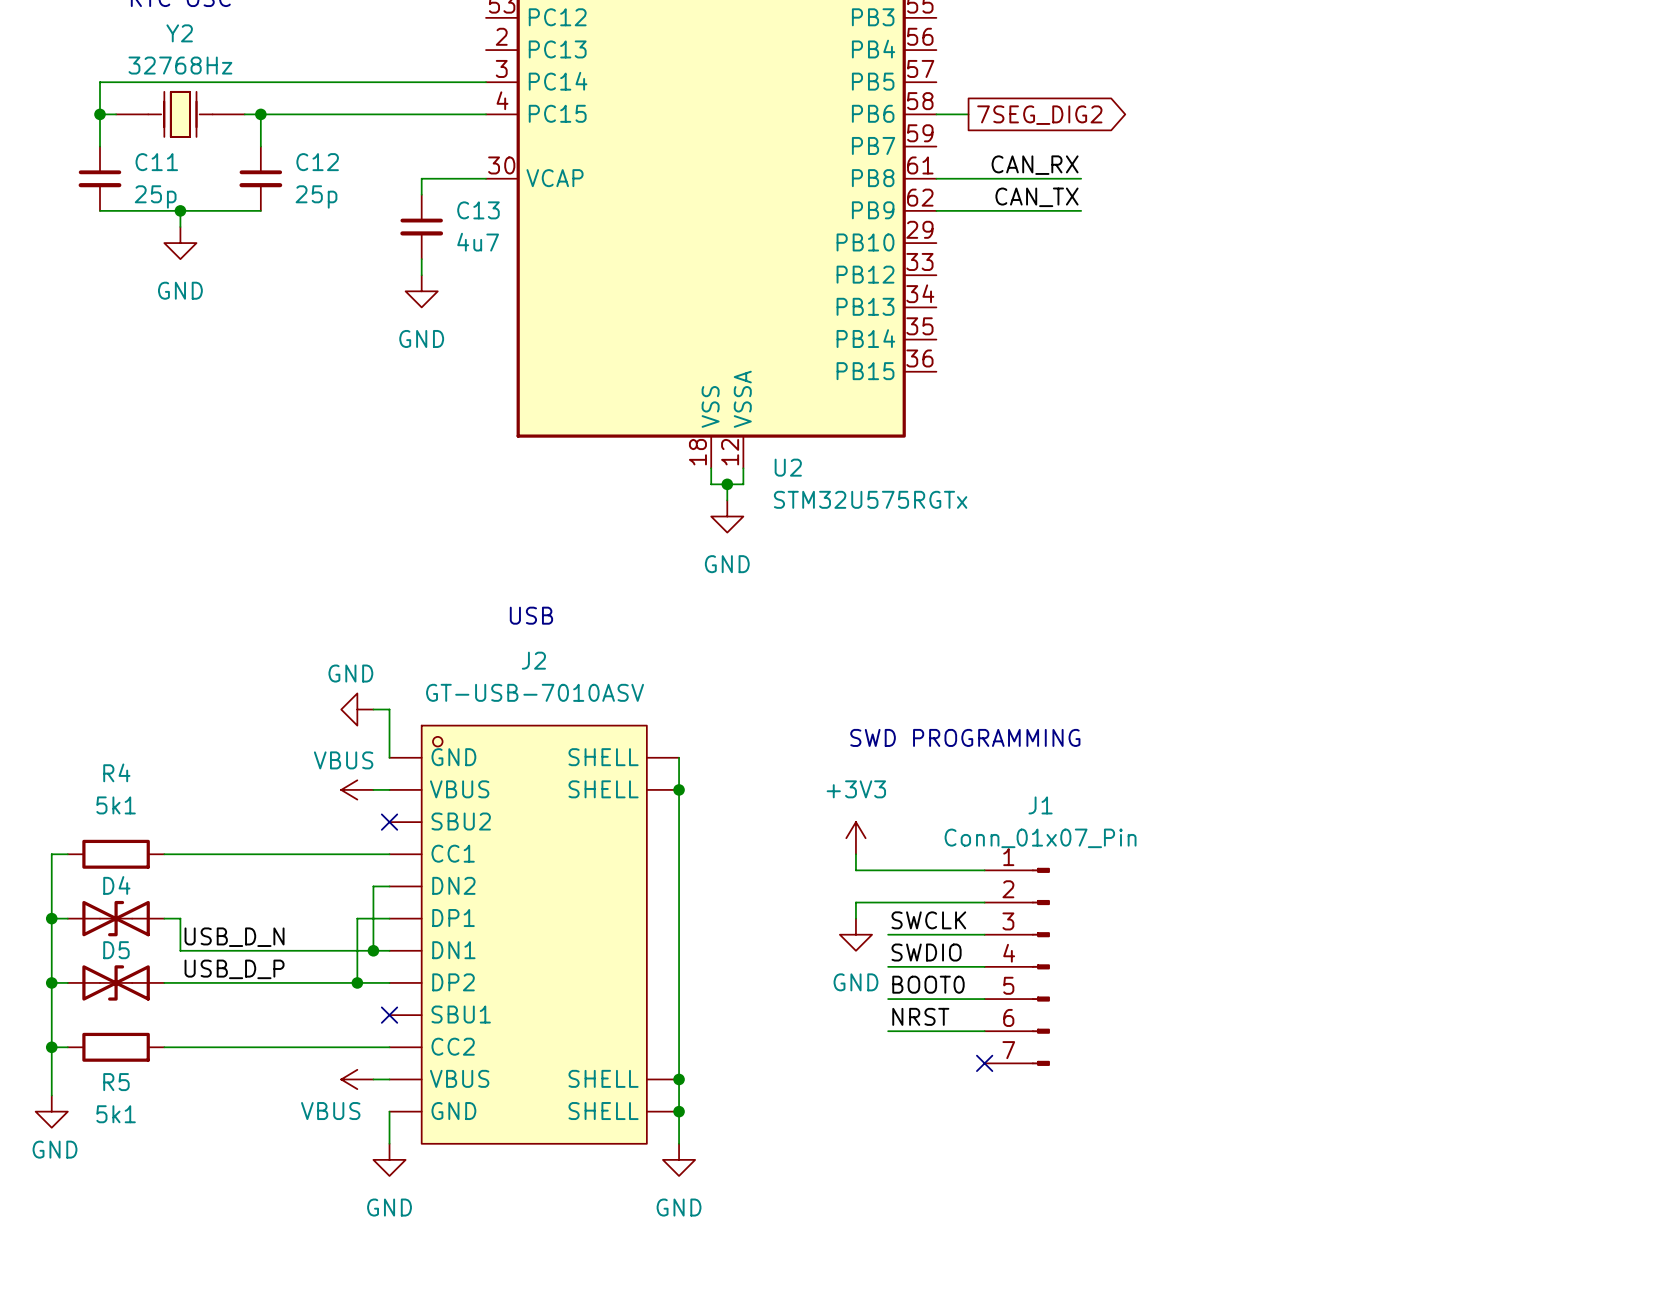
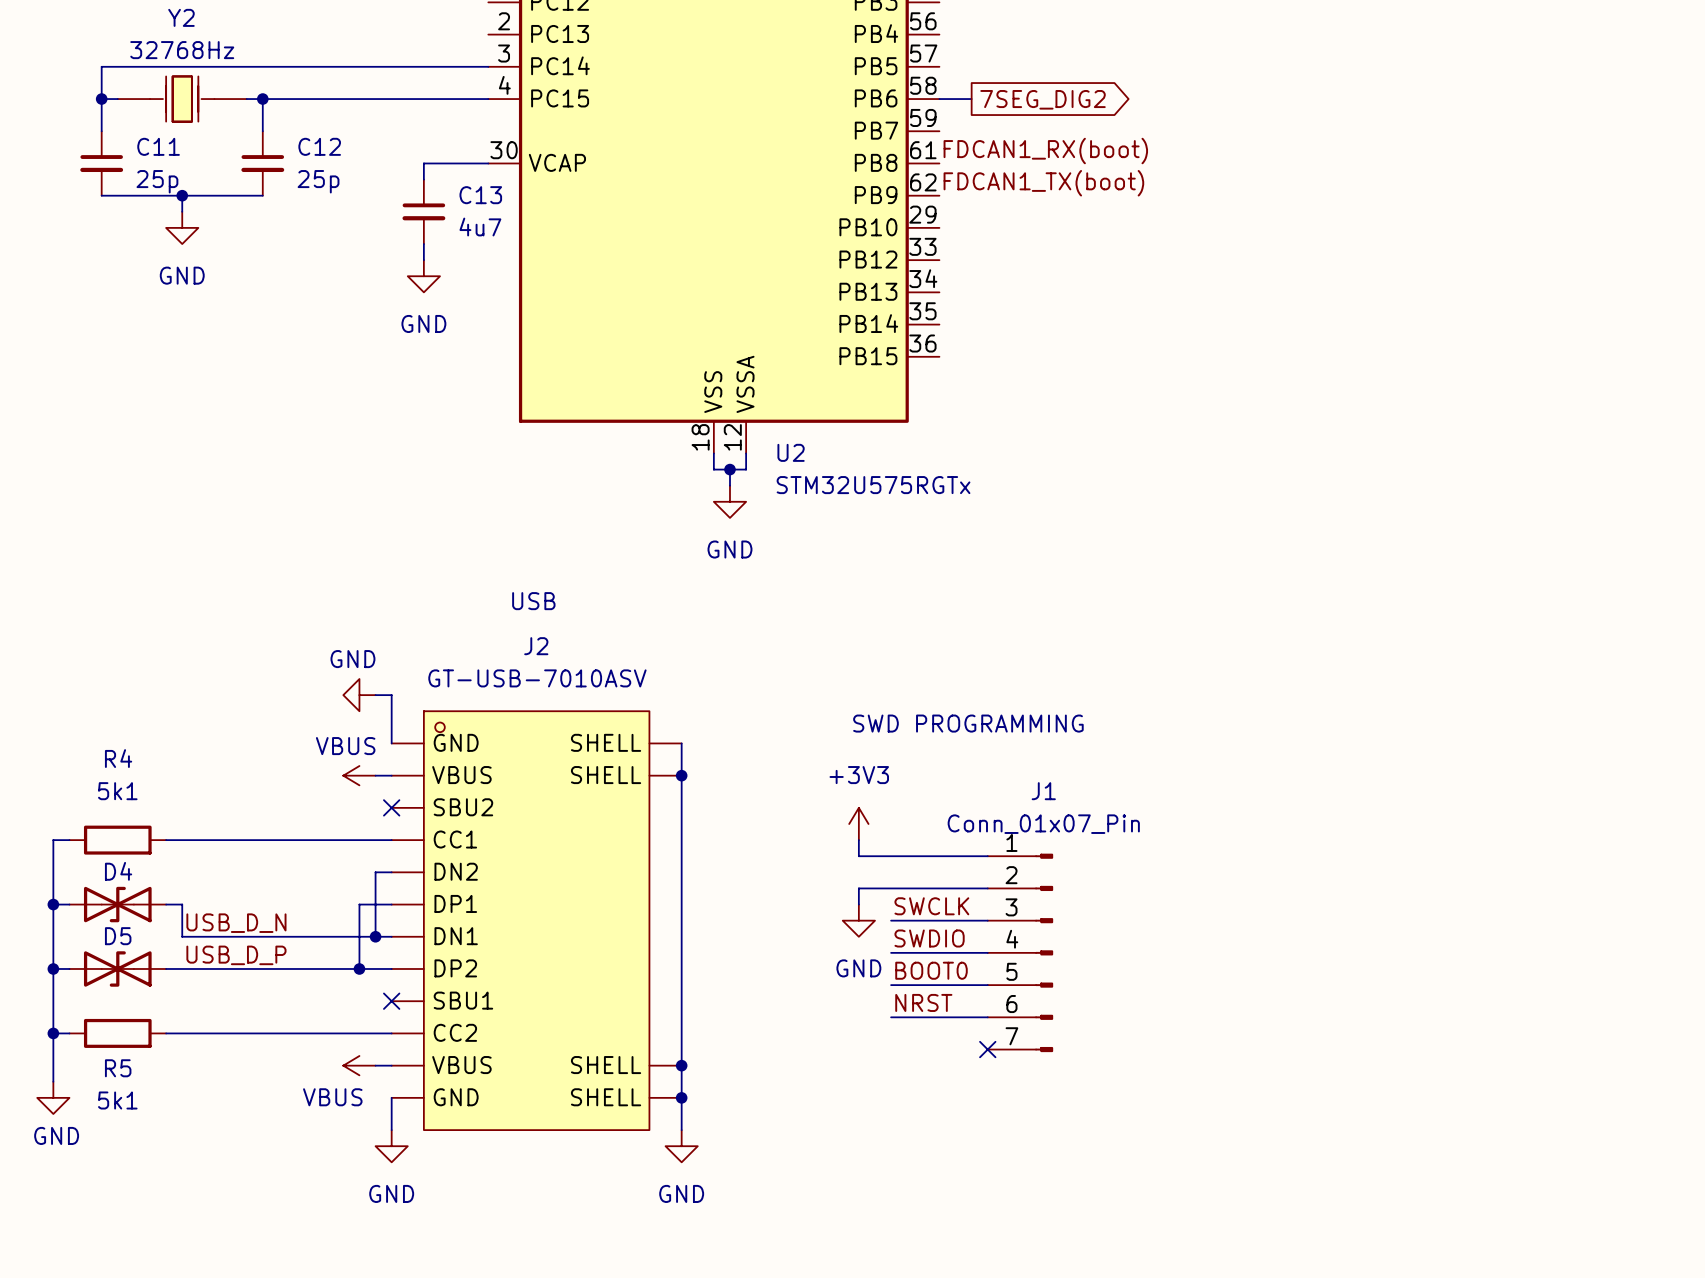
label: CAN_RX (1035, 165) -> none
label: none -> FDCAN1_RX(boot) (1045, 151)
wire: (936, 178) (1081, 178) -> none
label: CAN_TX (1036, 197) -> none
label: none -> FDCAN1_TX(boot) (1043, 183)
wire: (936, 210) (1081, 210) -> none

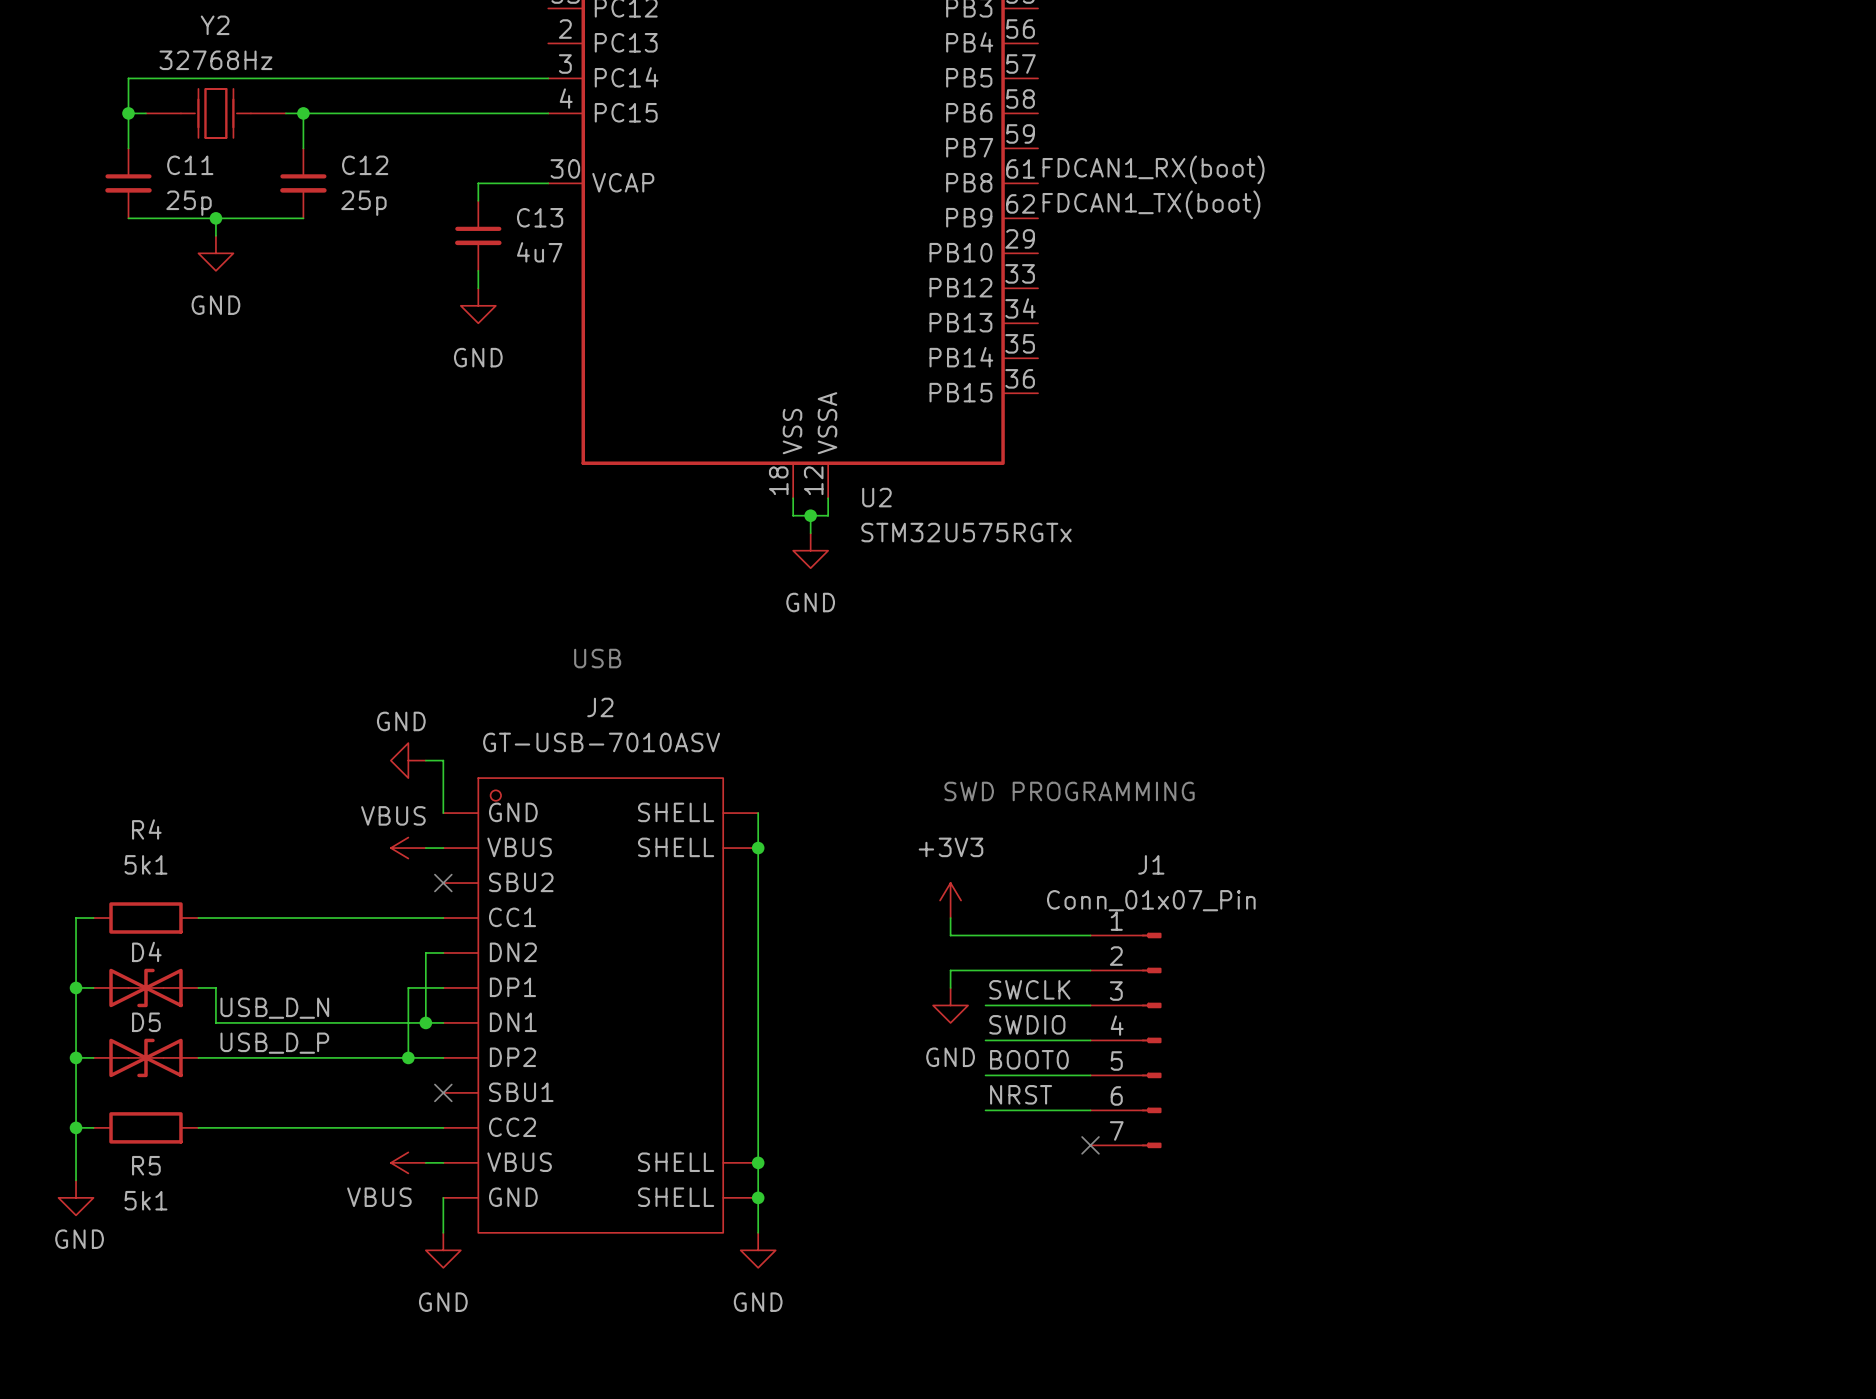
wire: (939, 99) (971, 99) -> none
global label: 7SEG_DIG2 (1043, 99) -> none

